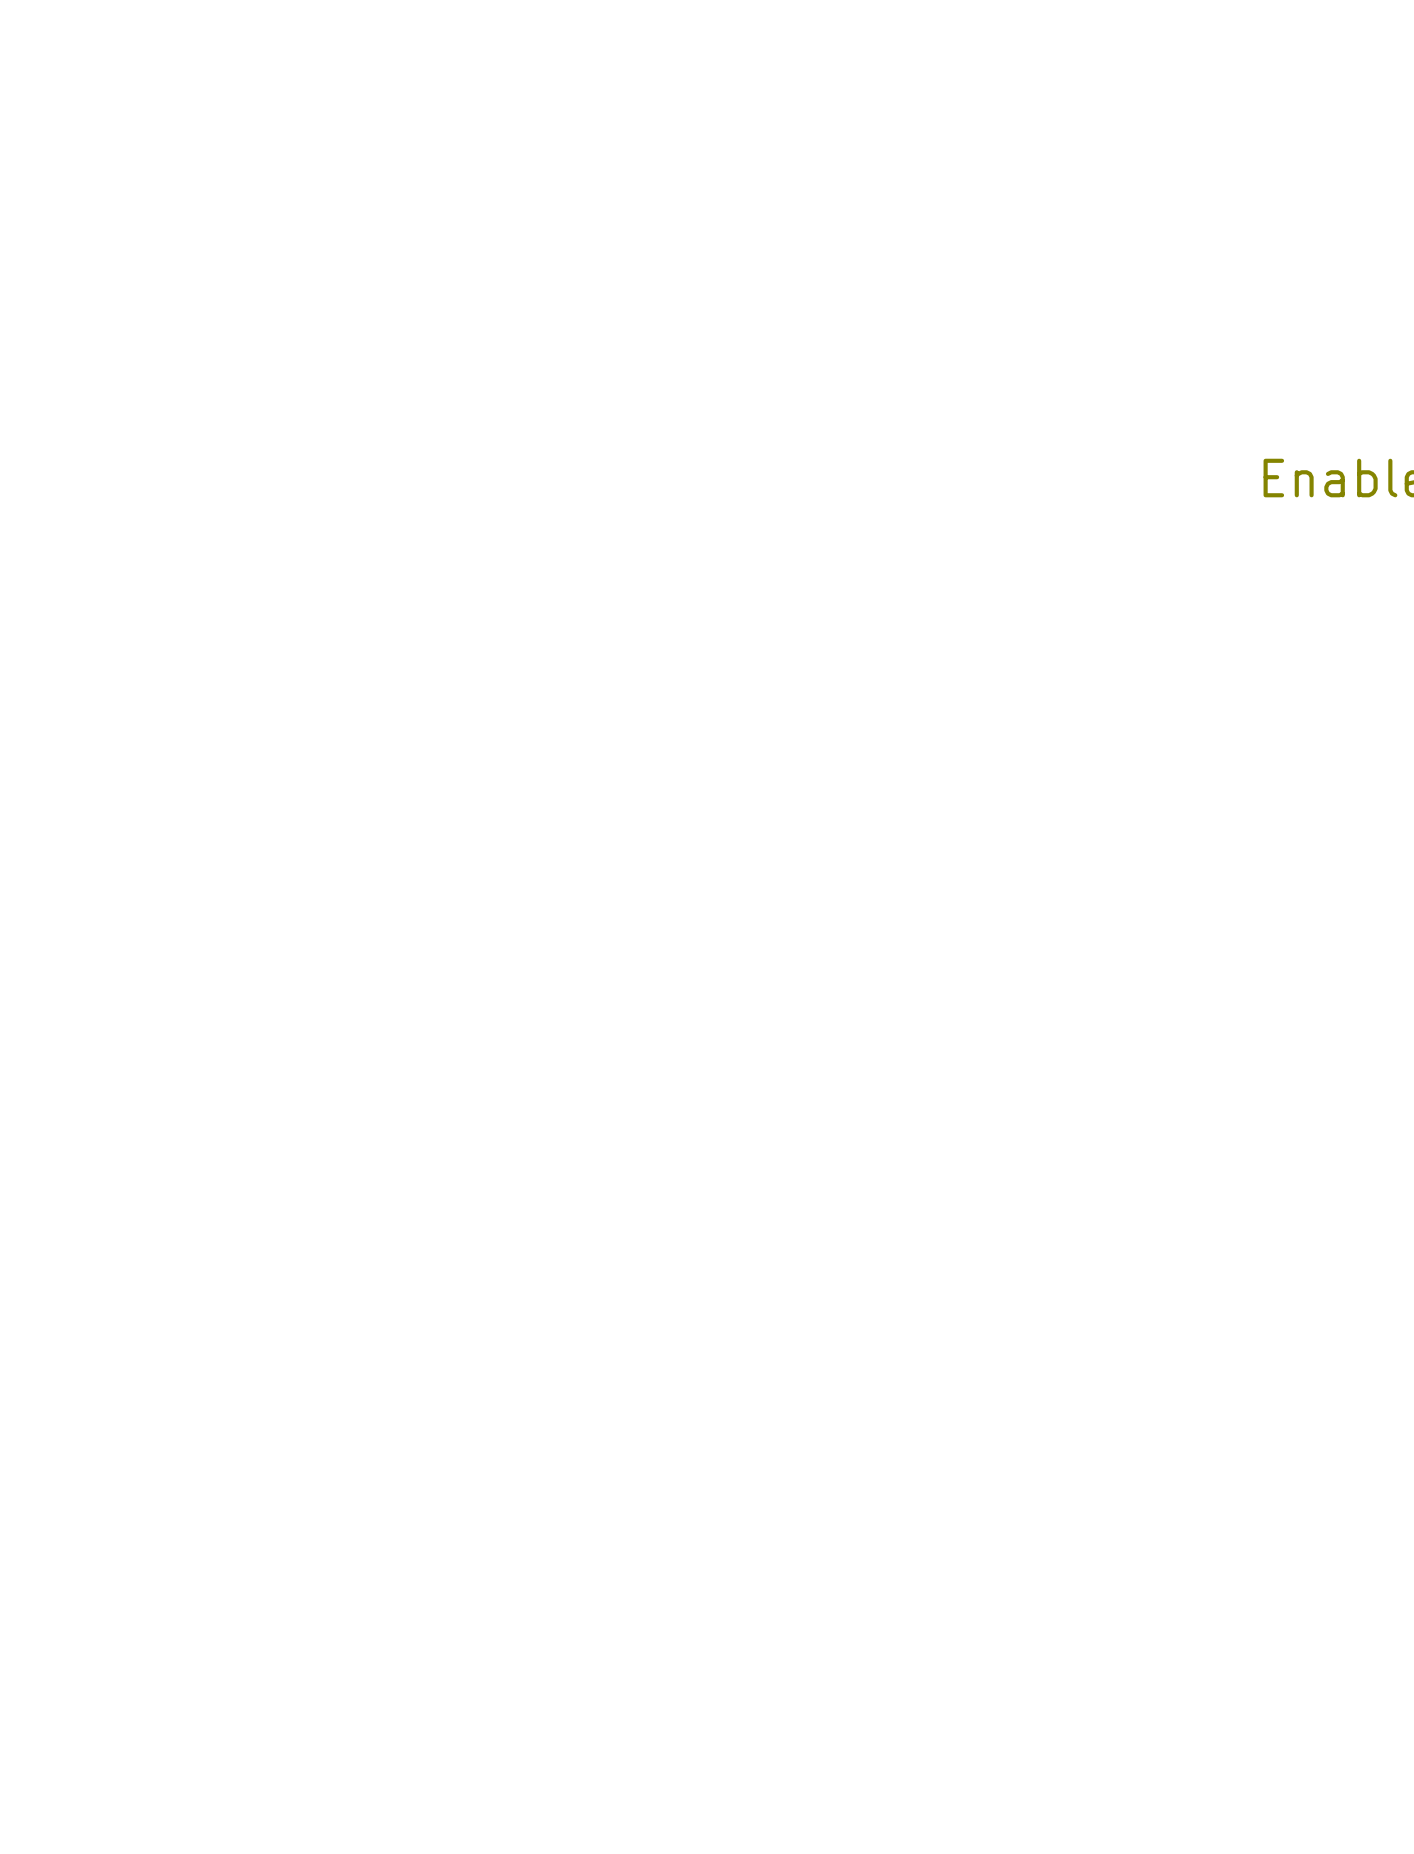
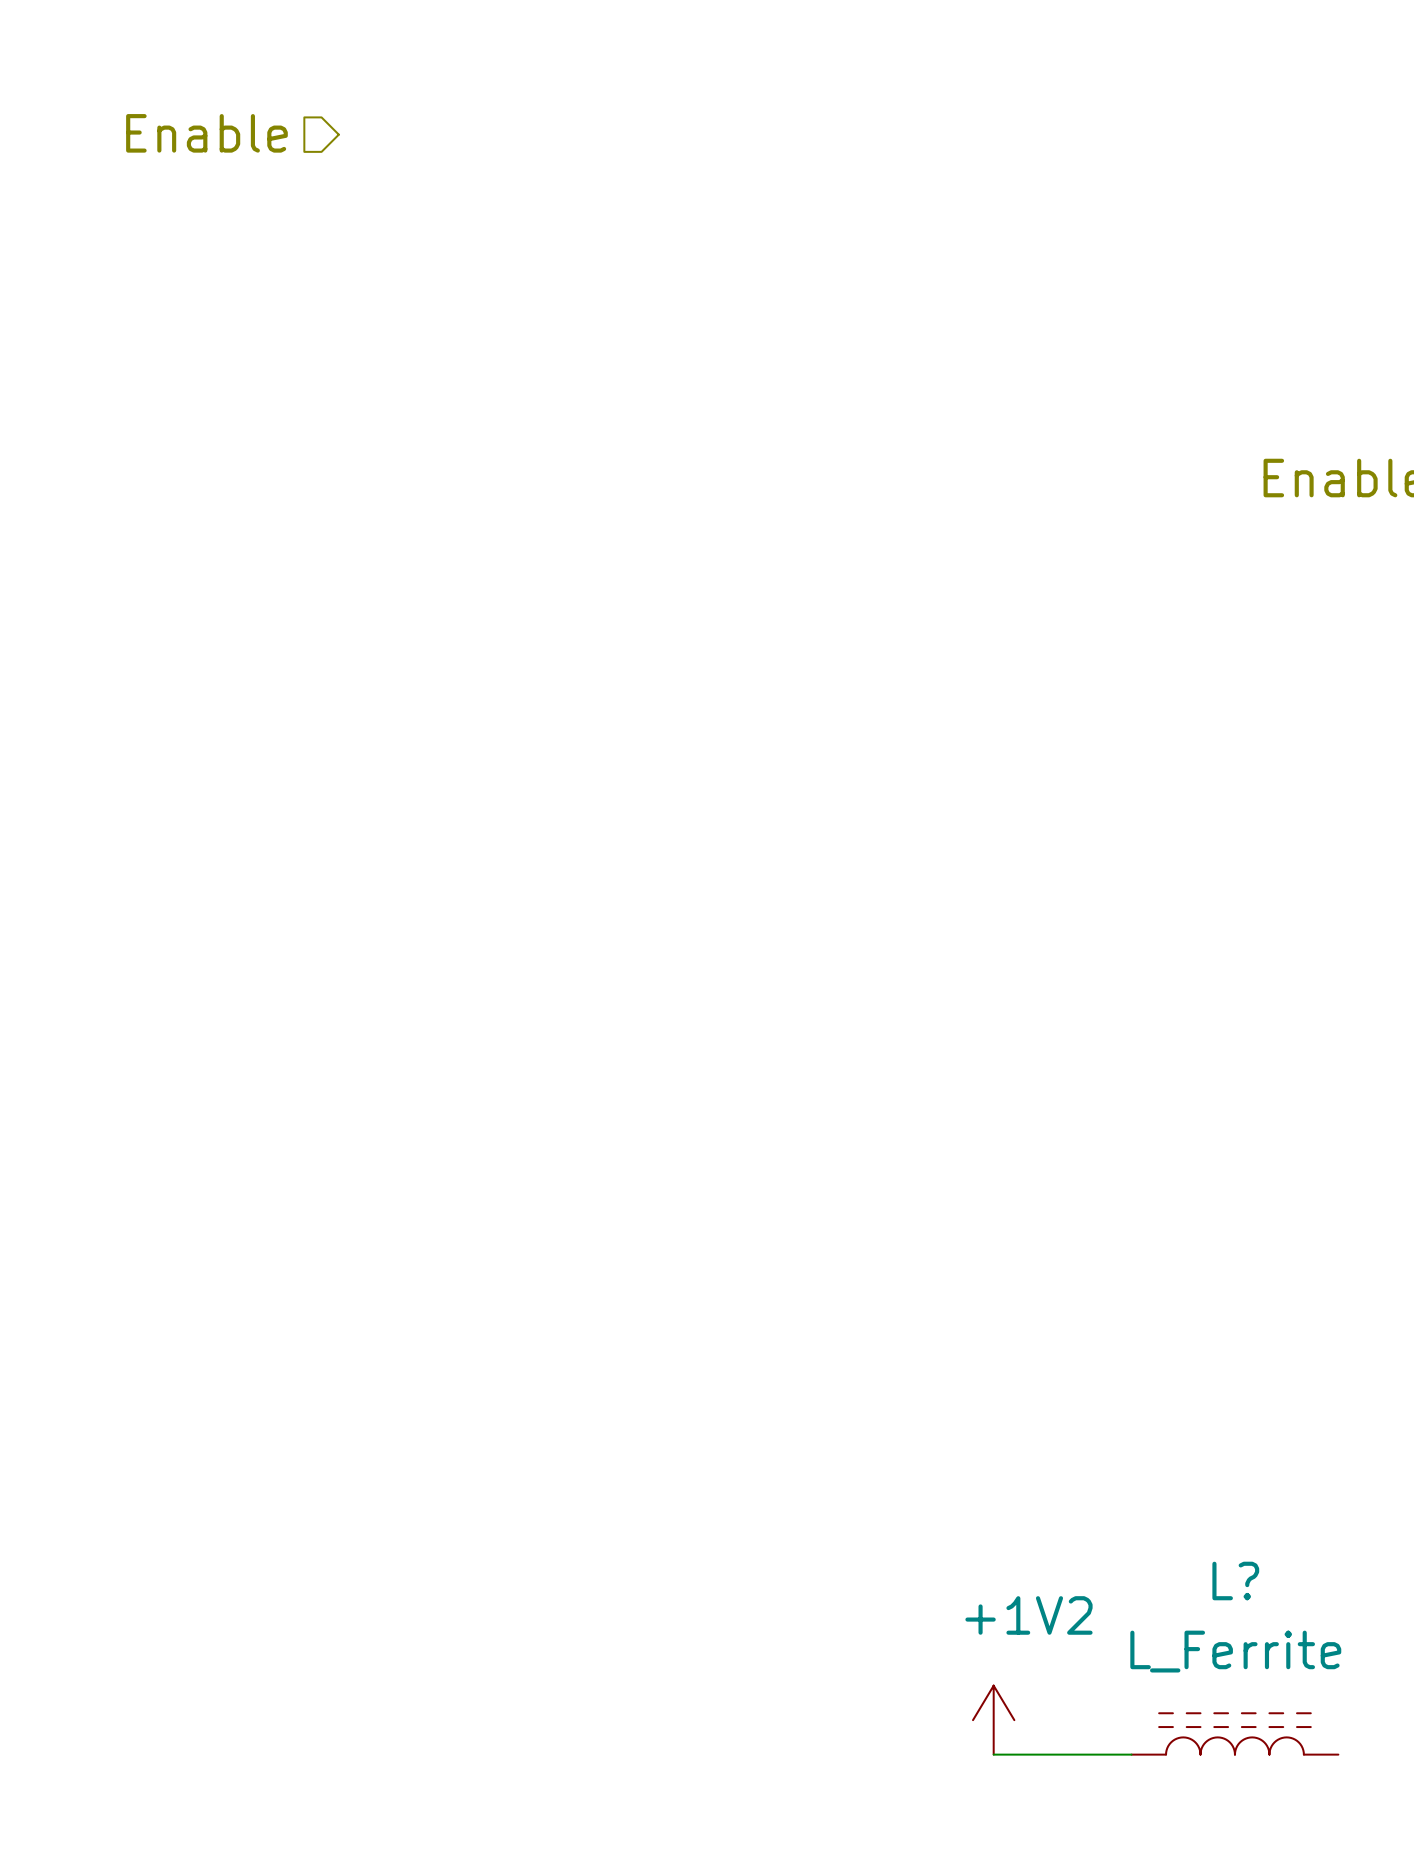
hierarchical label: none -> Enable (206, 133)
power symbol: none -> +1V2 (993, 1720)
L?: none -> L_Ferrite (1234, 1733)
wire: none -> (993, 1754) (1131, 1754)

